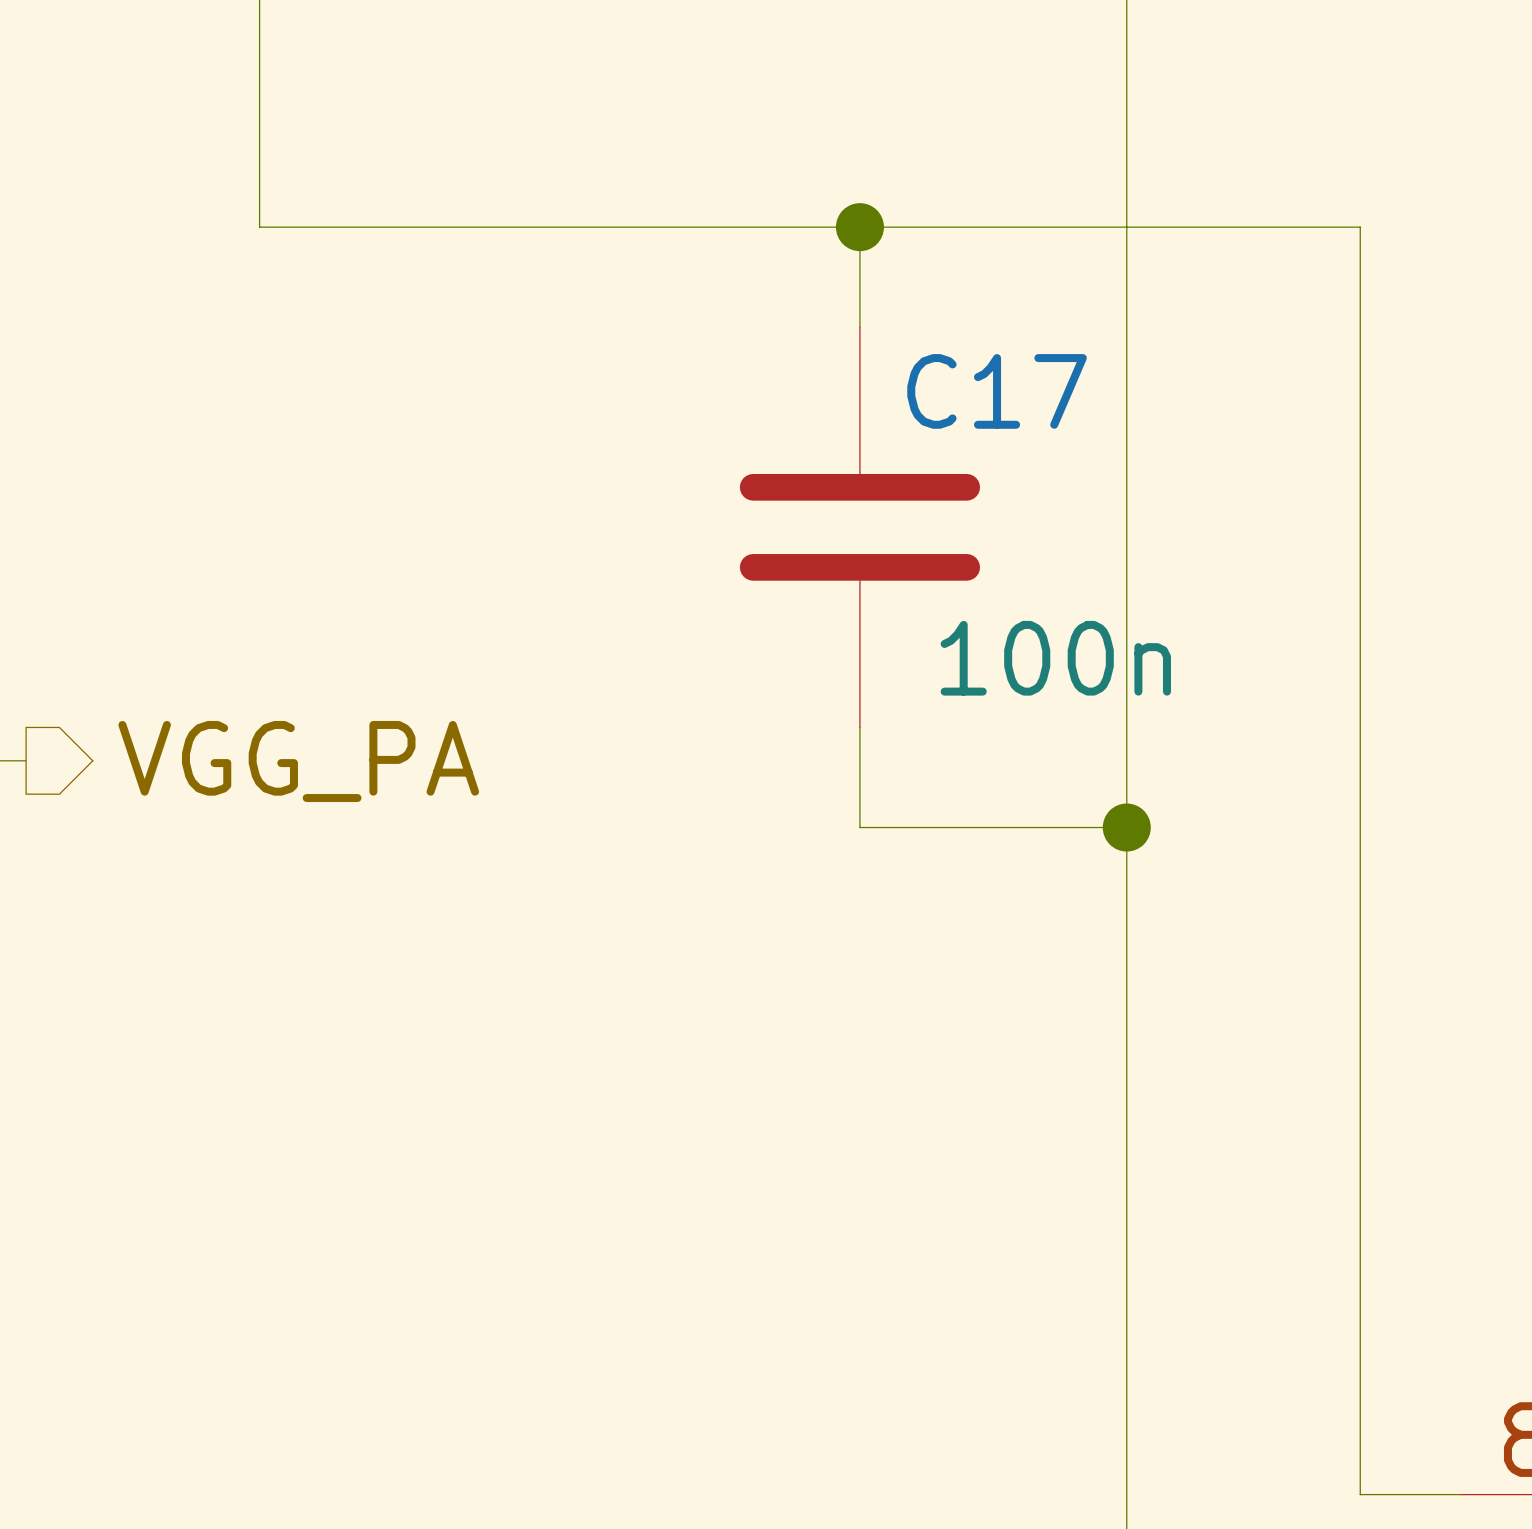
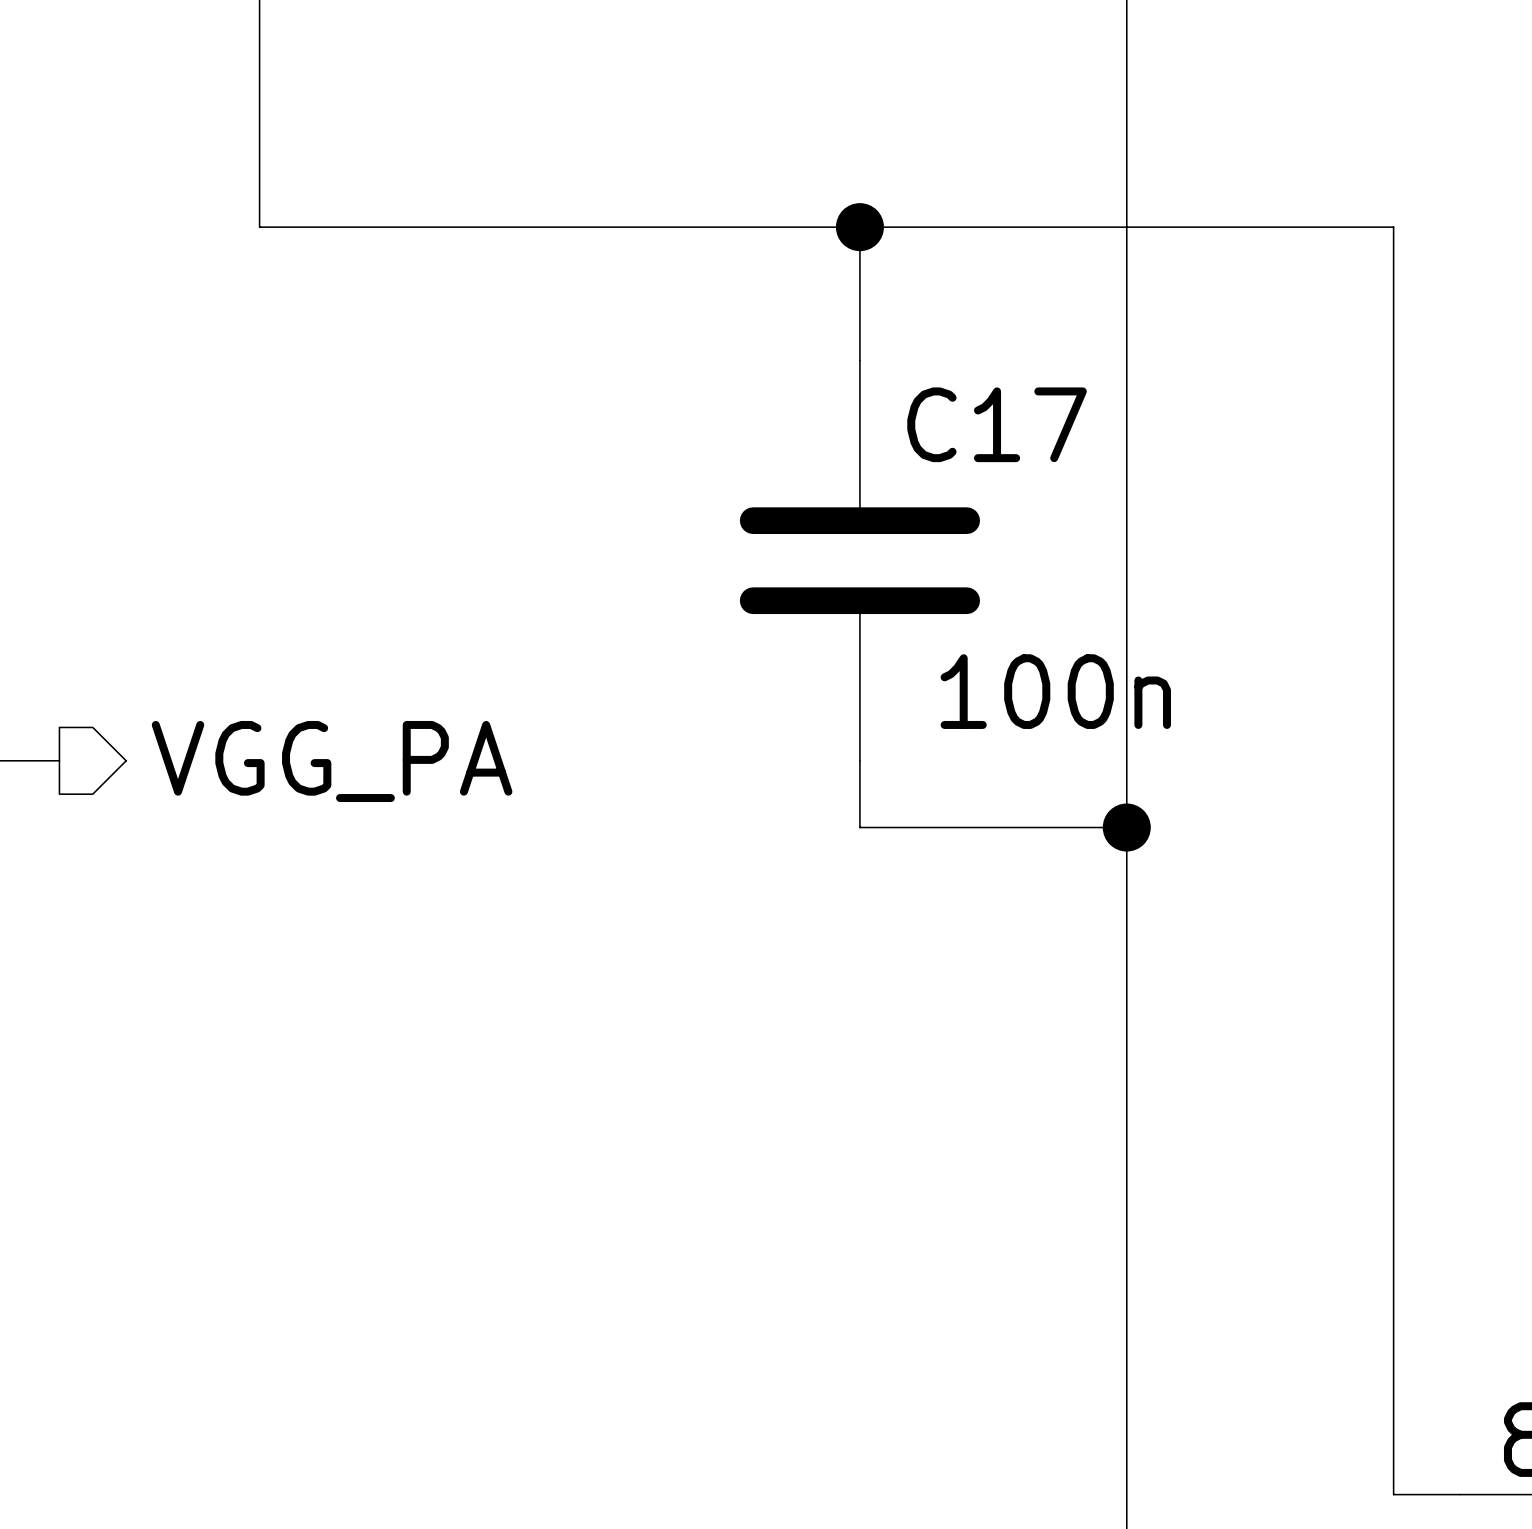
wire: (1360, 227) (1360, 1494) (1393, 1494) -> (1360, 227) (1393, 227) (1393, 1494)
C17 position: (859, 527) -> (859, 560)
wire: none -> (26, 760) (59, 760)
hierarchical label position: VGG_PA (298, 761) -> VGG_PA (332, 761)

